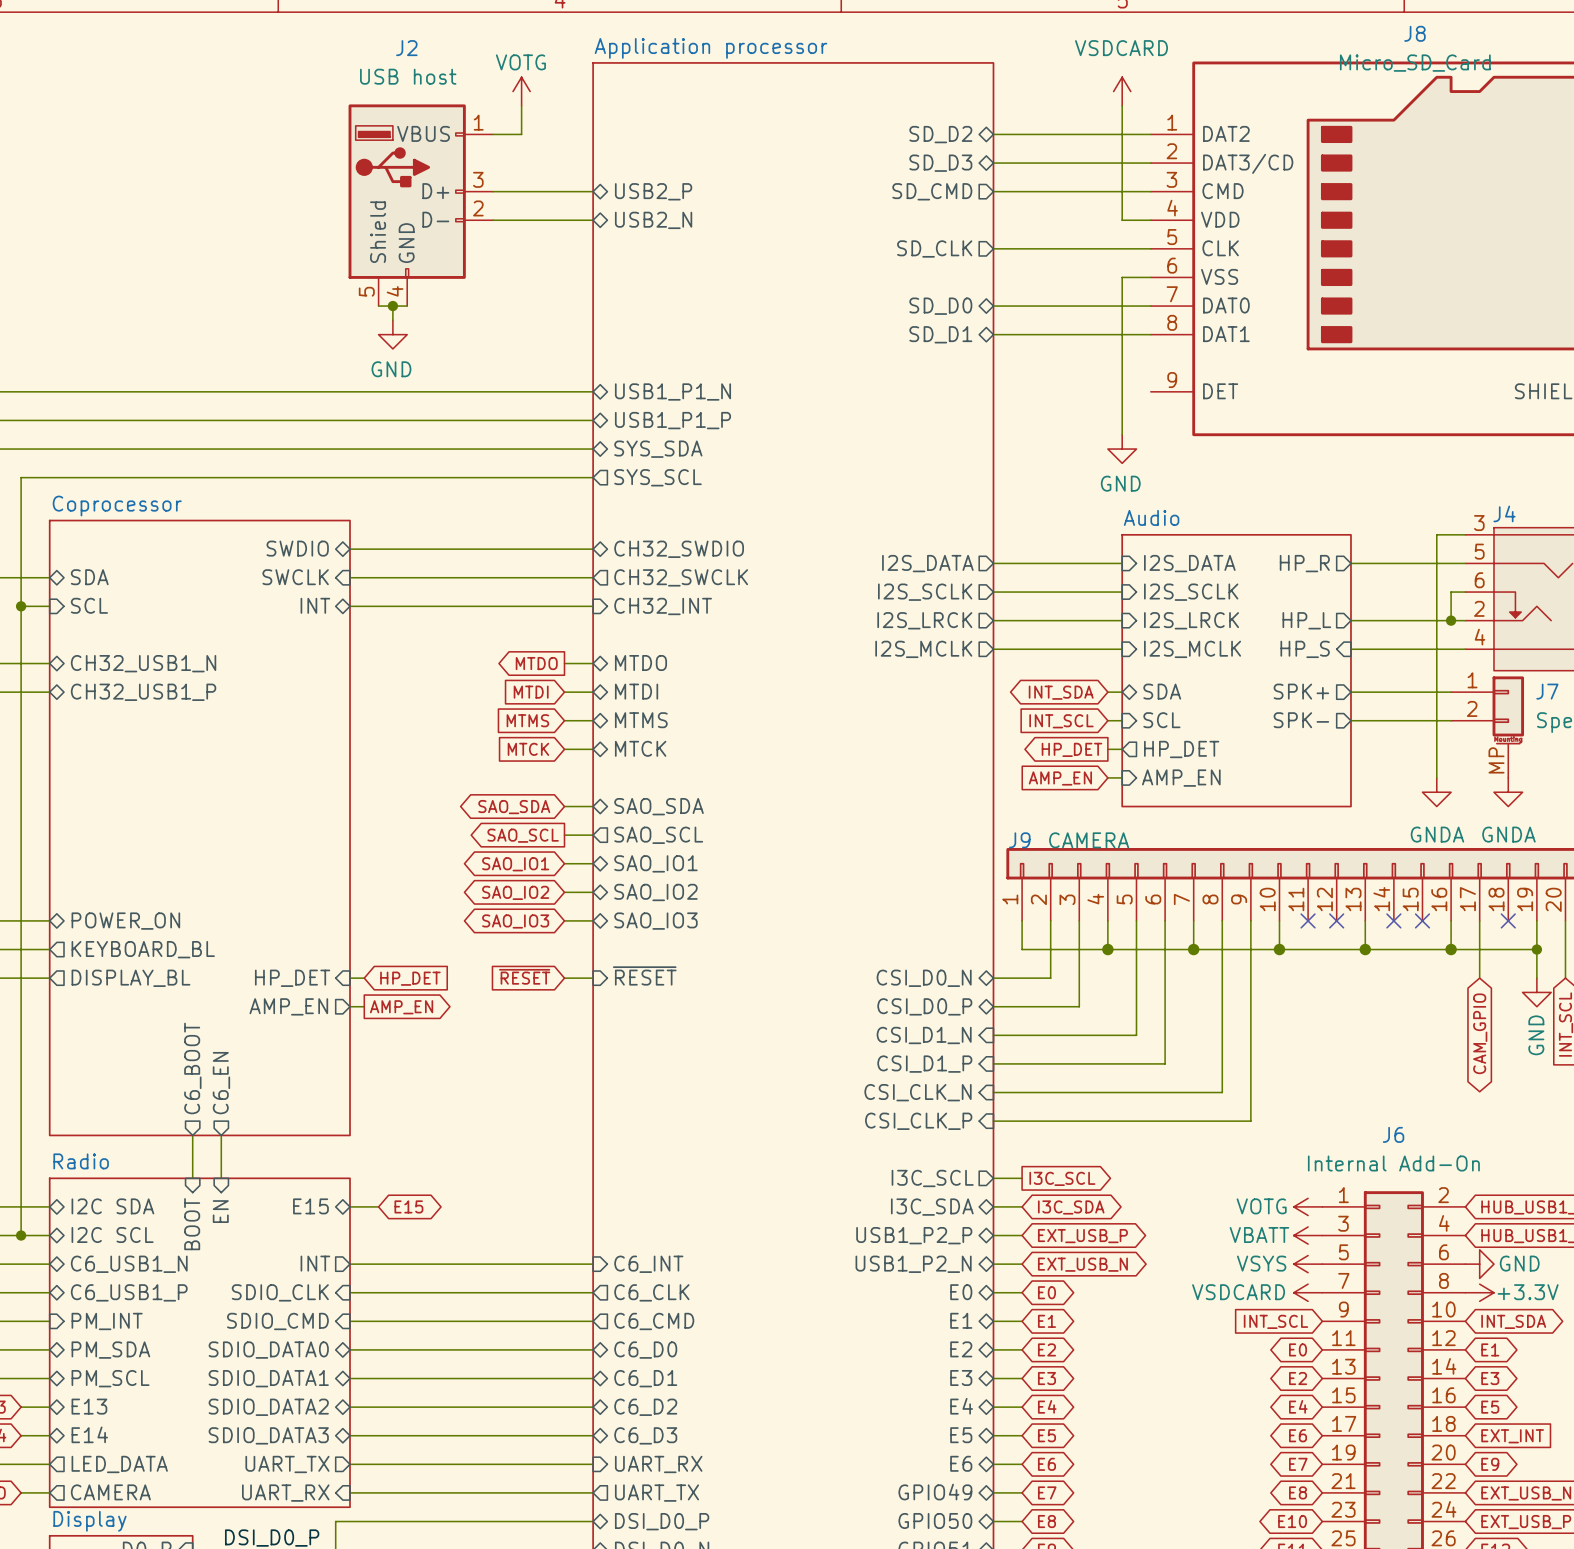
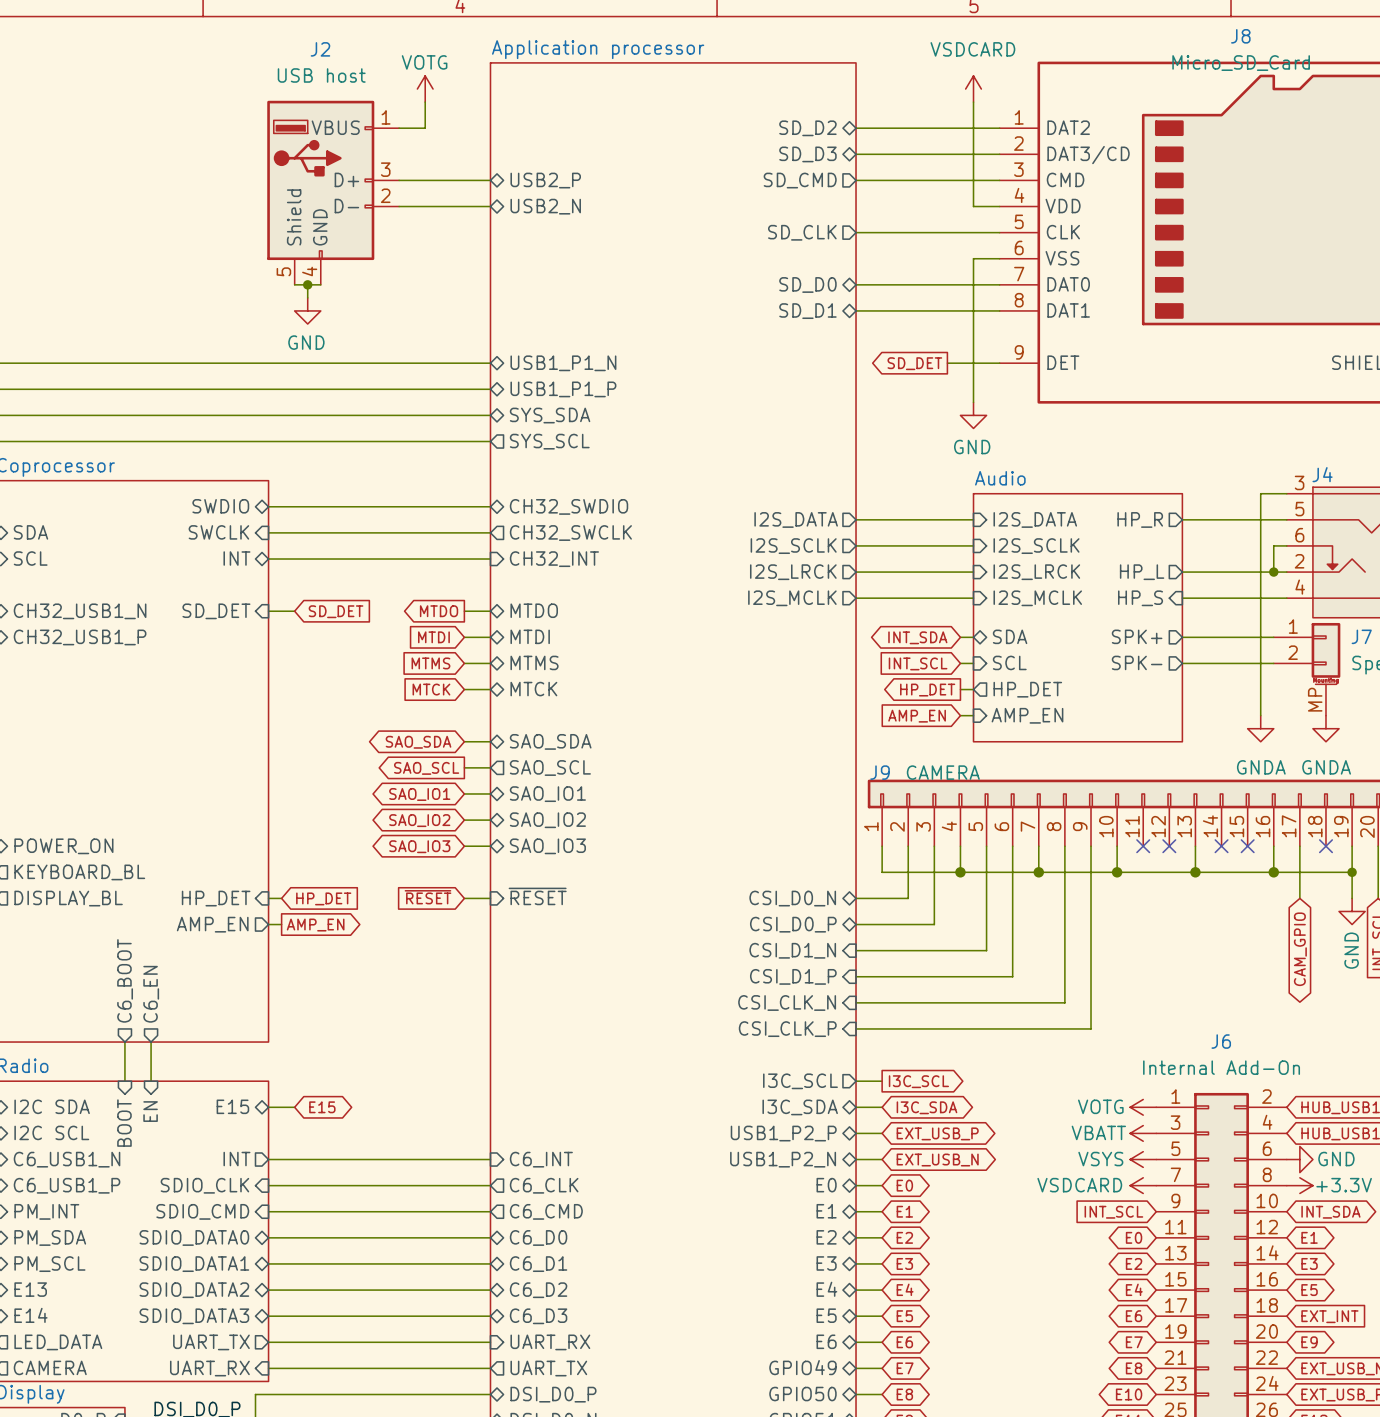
wire: none -> (947, 363) (999, 363)
global label: none -> SD_DET (914, 363)
sheet pin: none -> SD_DET (216, 611)
wire: none -> (268, 611) (294, 611)
global label: none -> SD_DET (336, 611)

